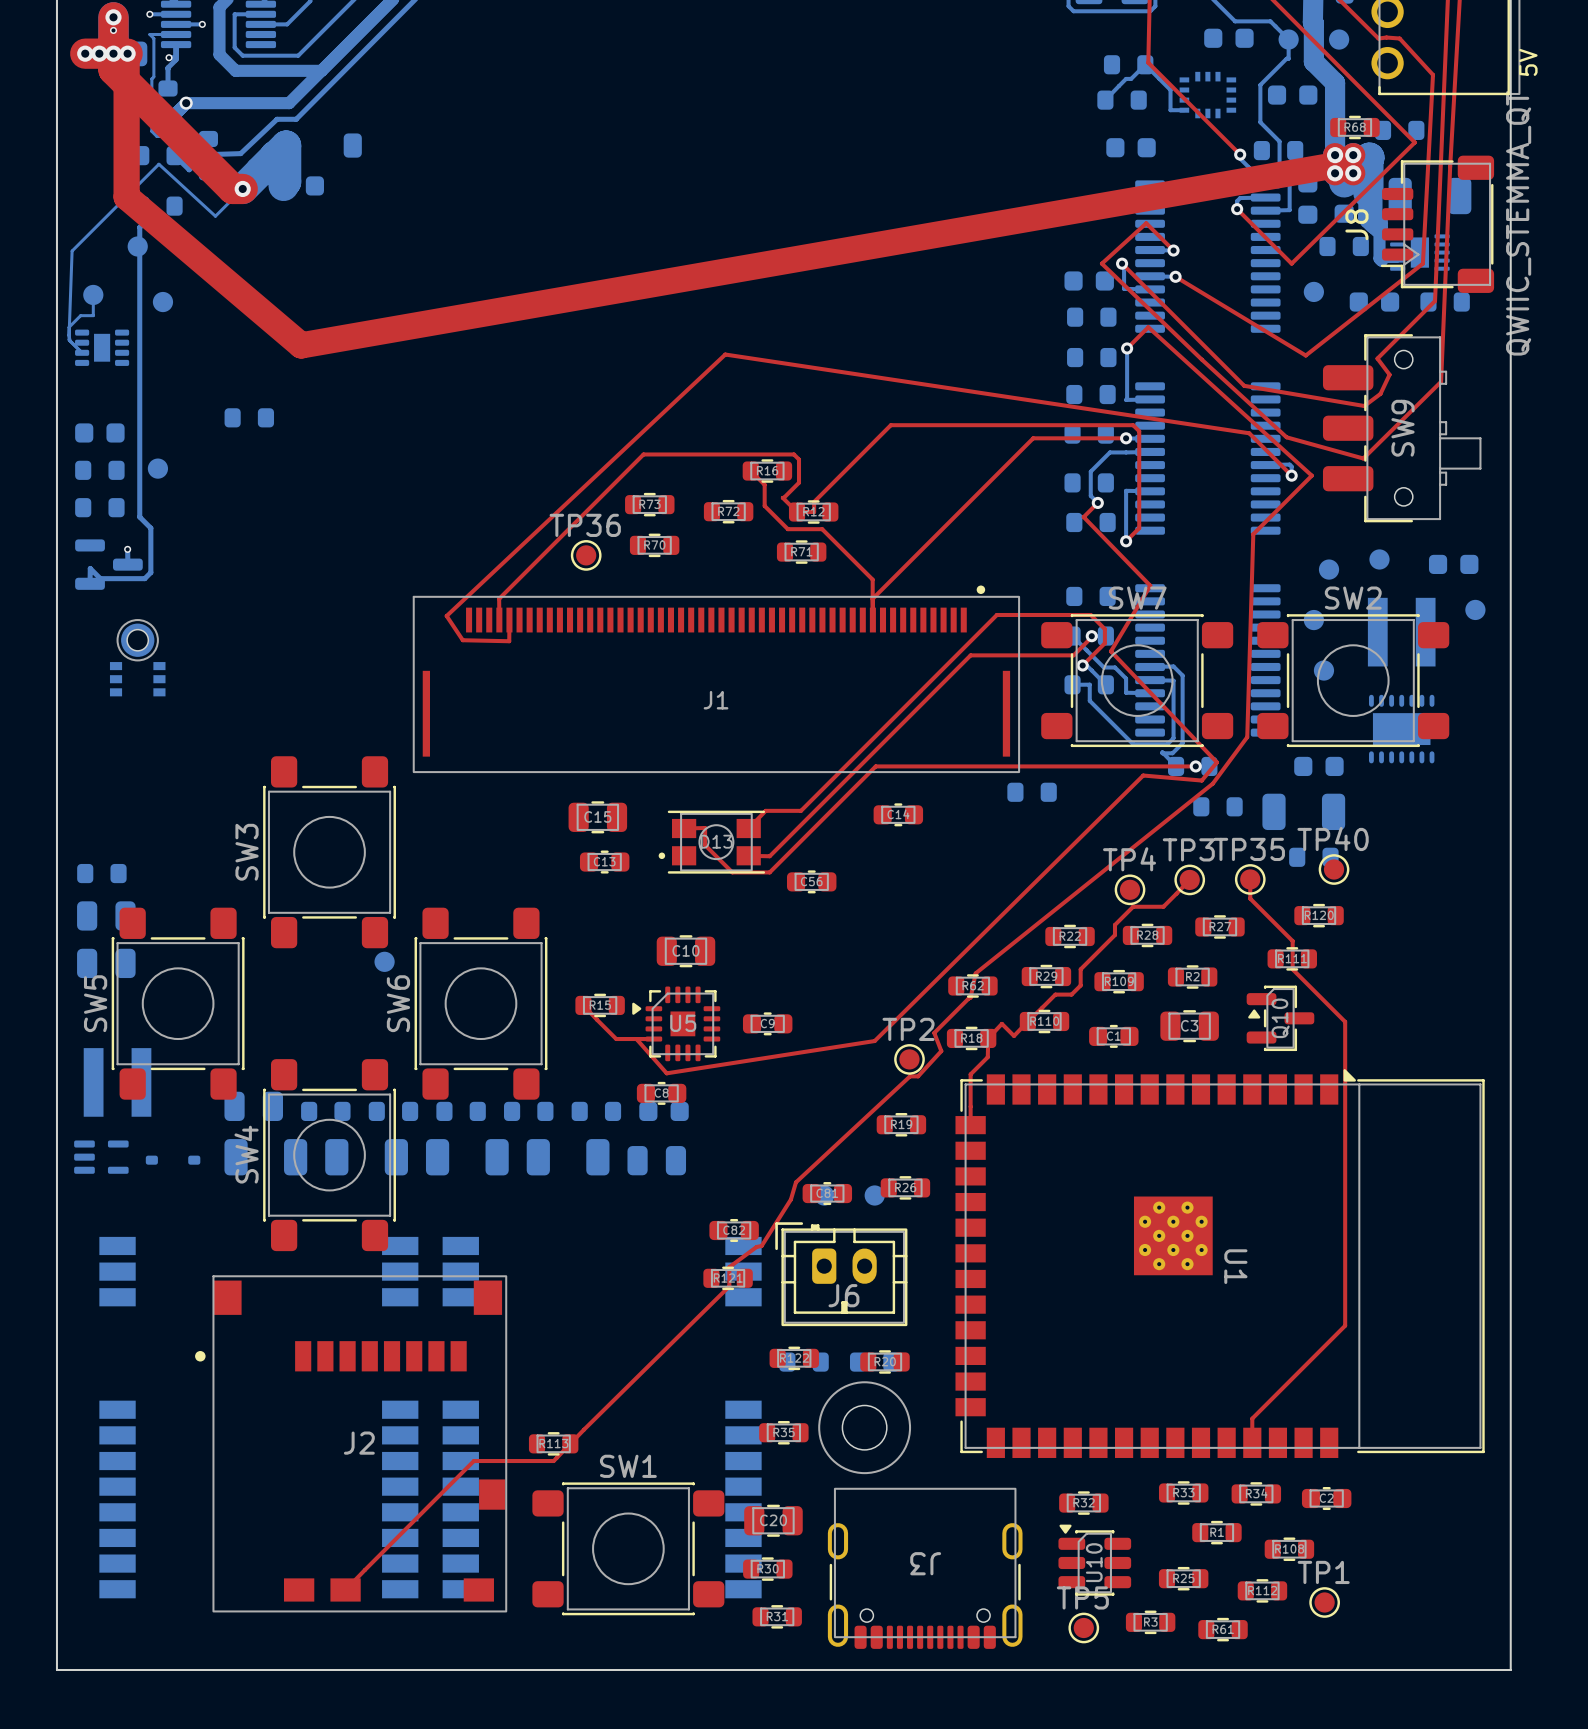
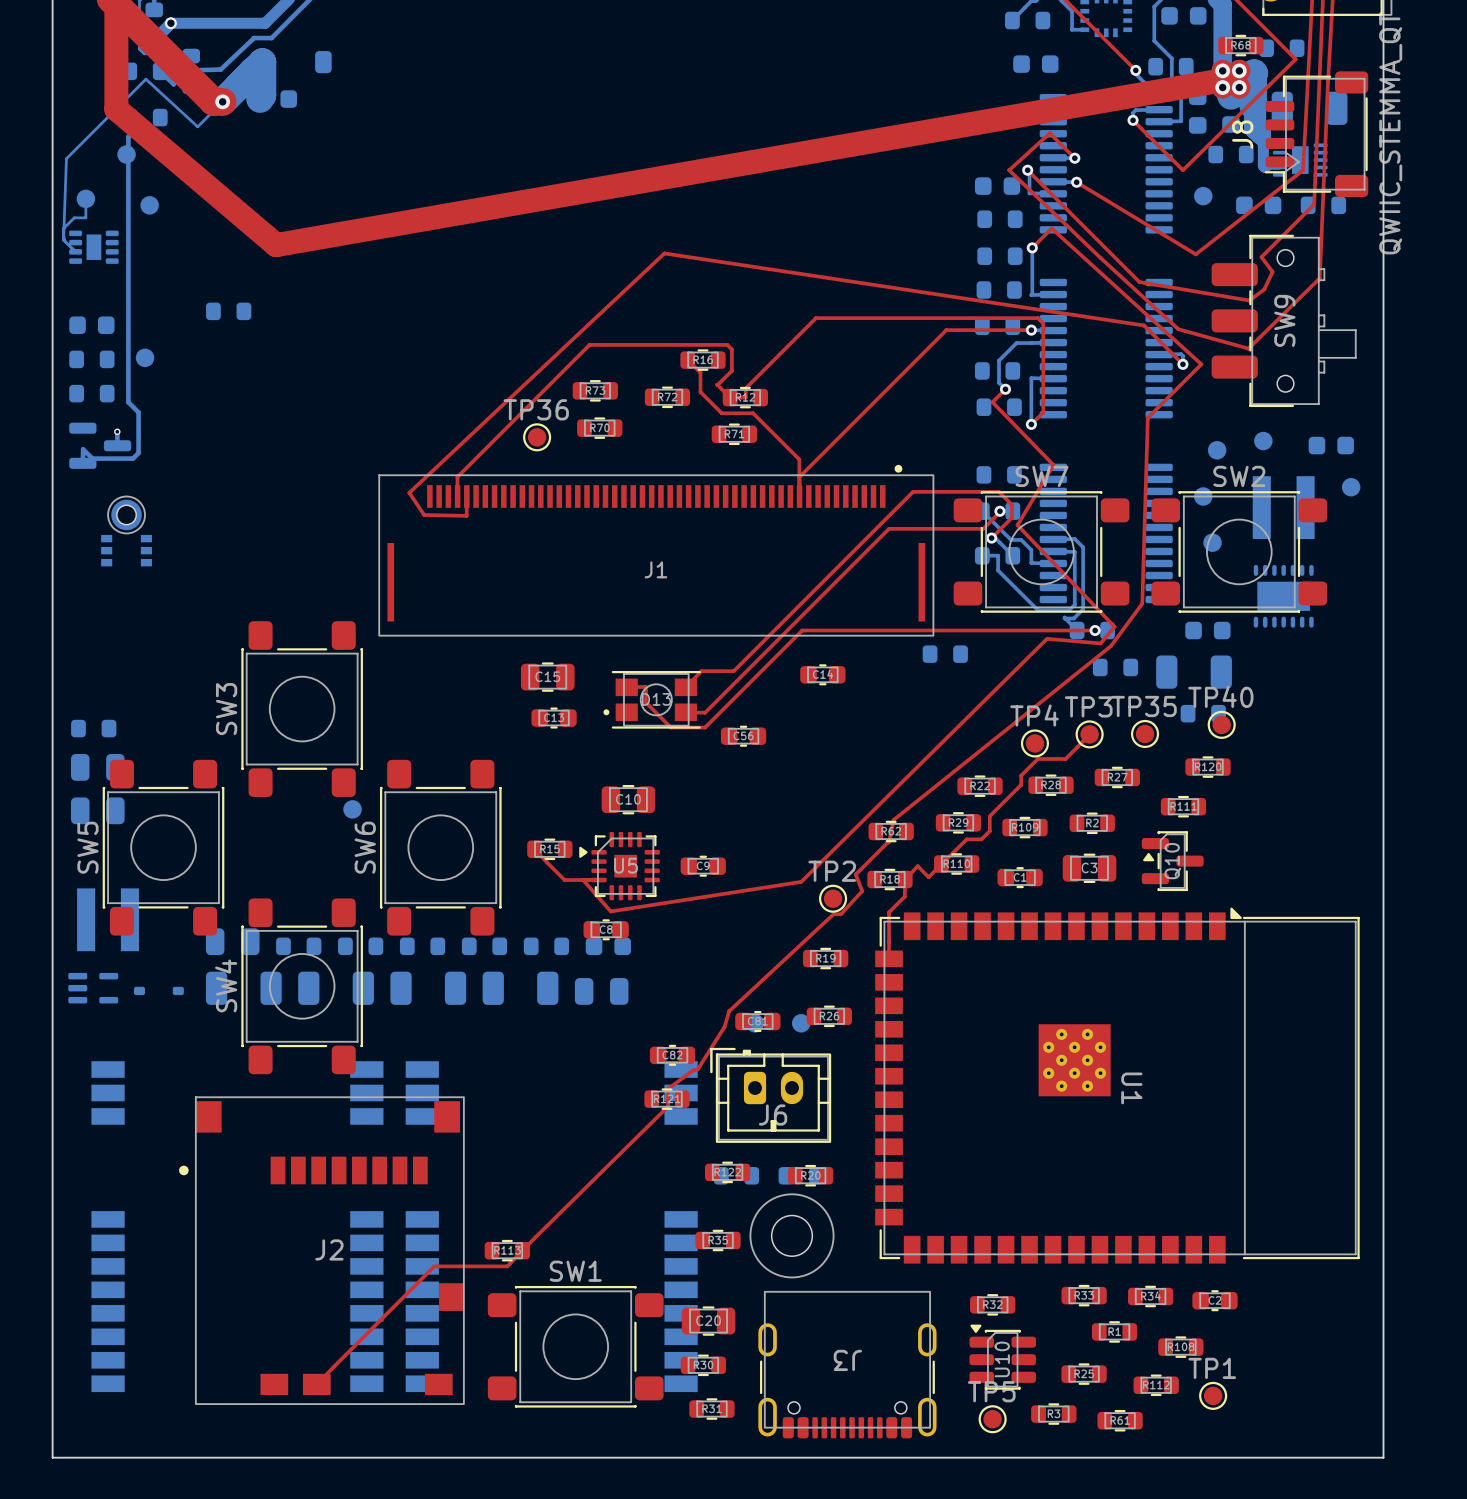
top track: (1250, 879) (1250, 898) (1292, 941) (1292, 969) (1345, 1021) (1345, 1325) (1252, 1418) (1252, 1442) -> none

